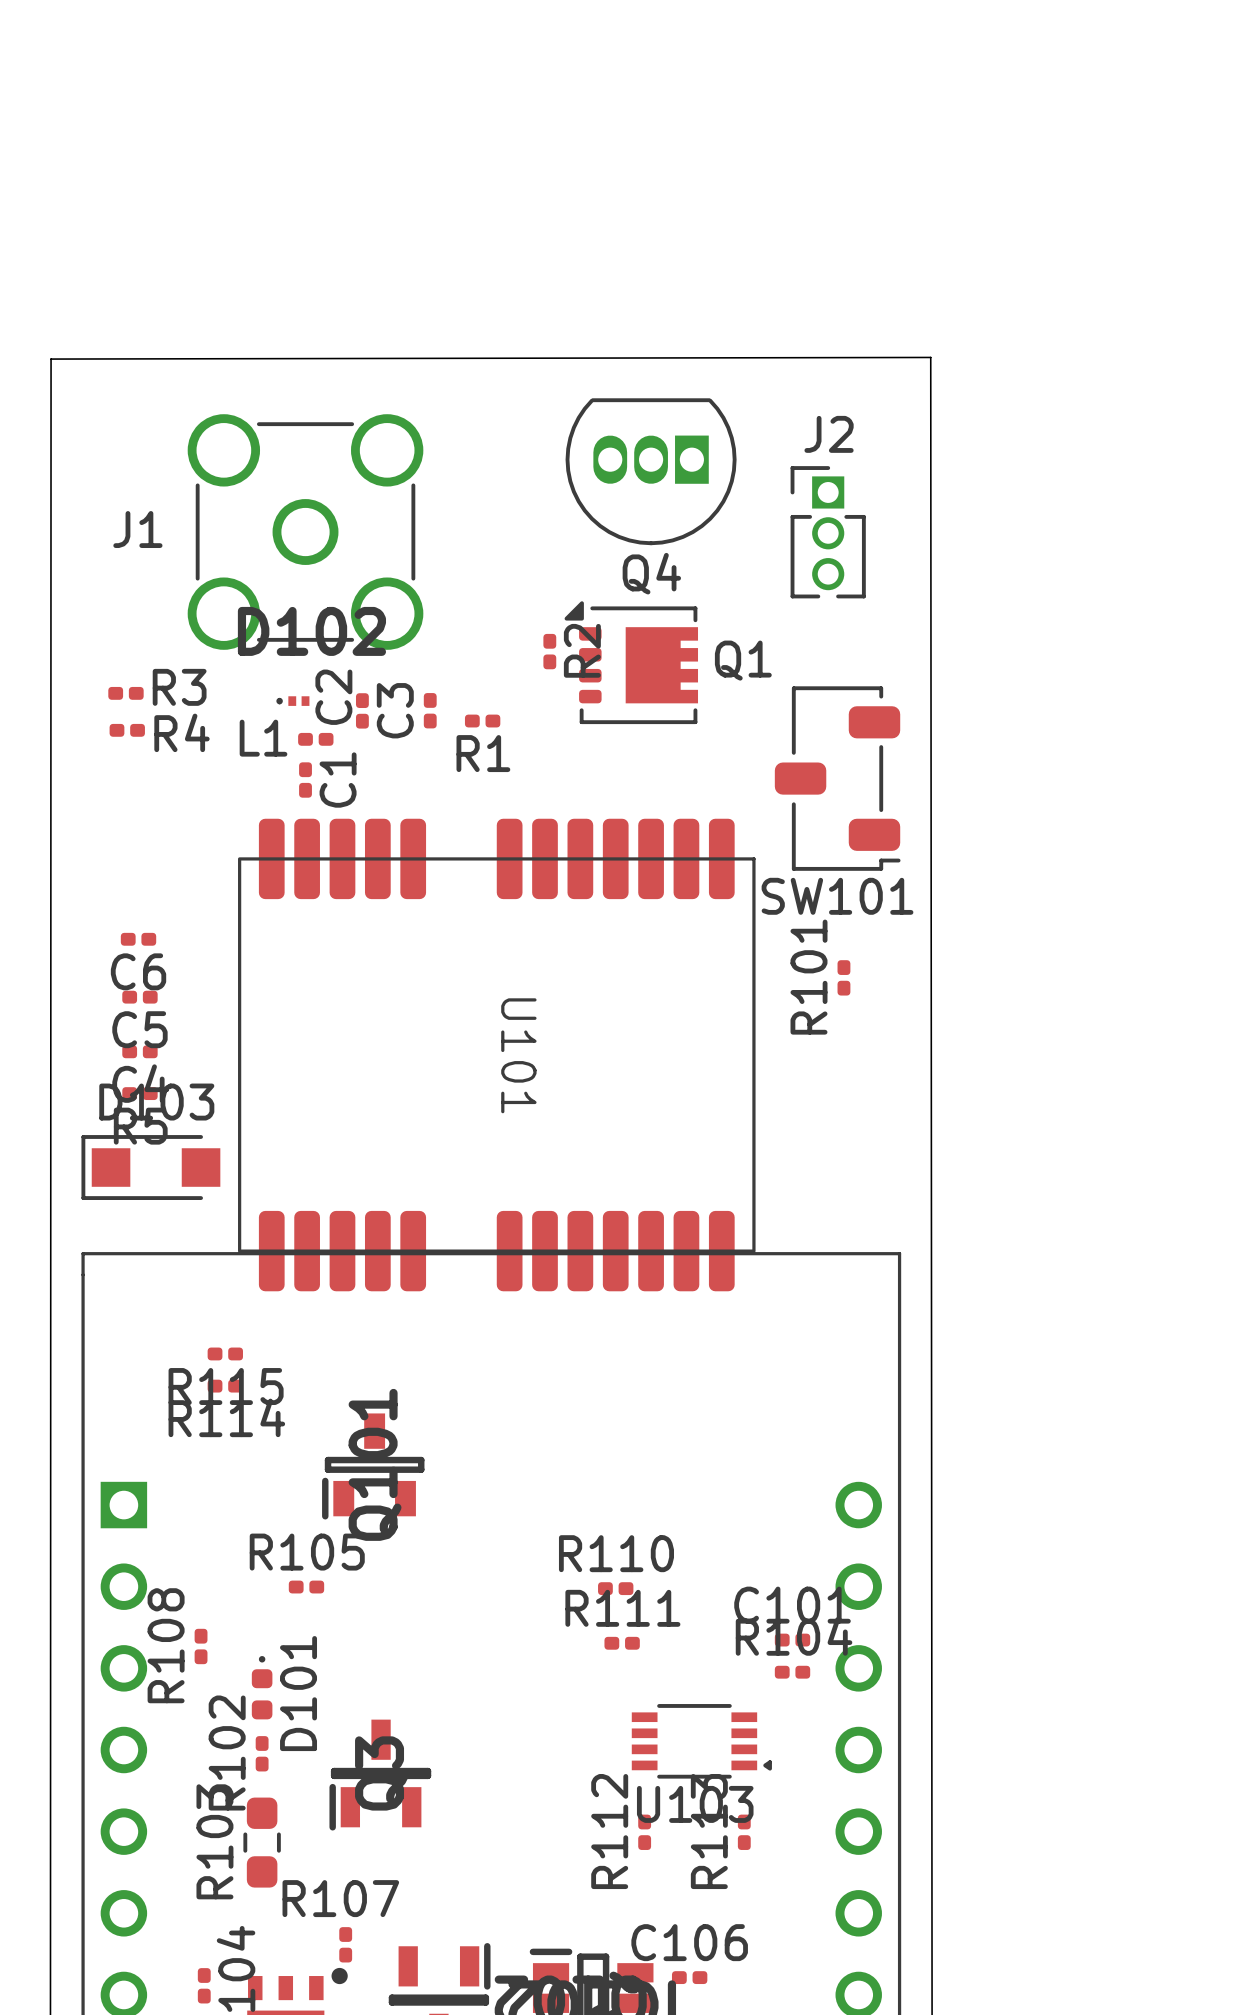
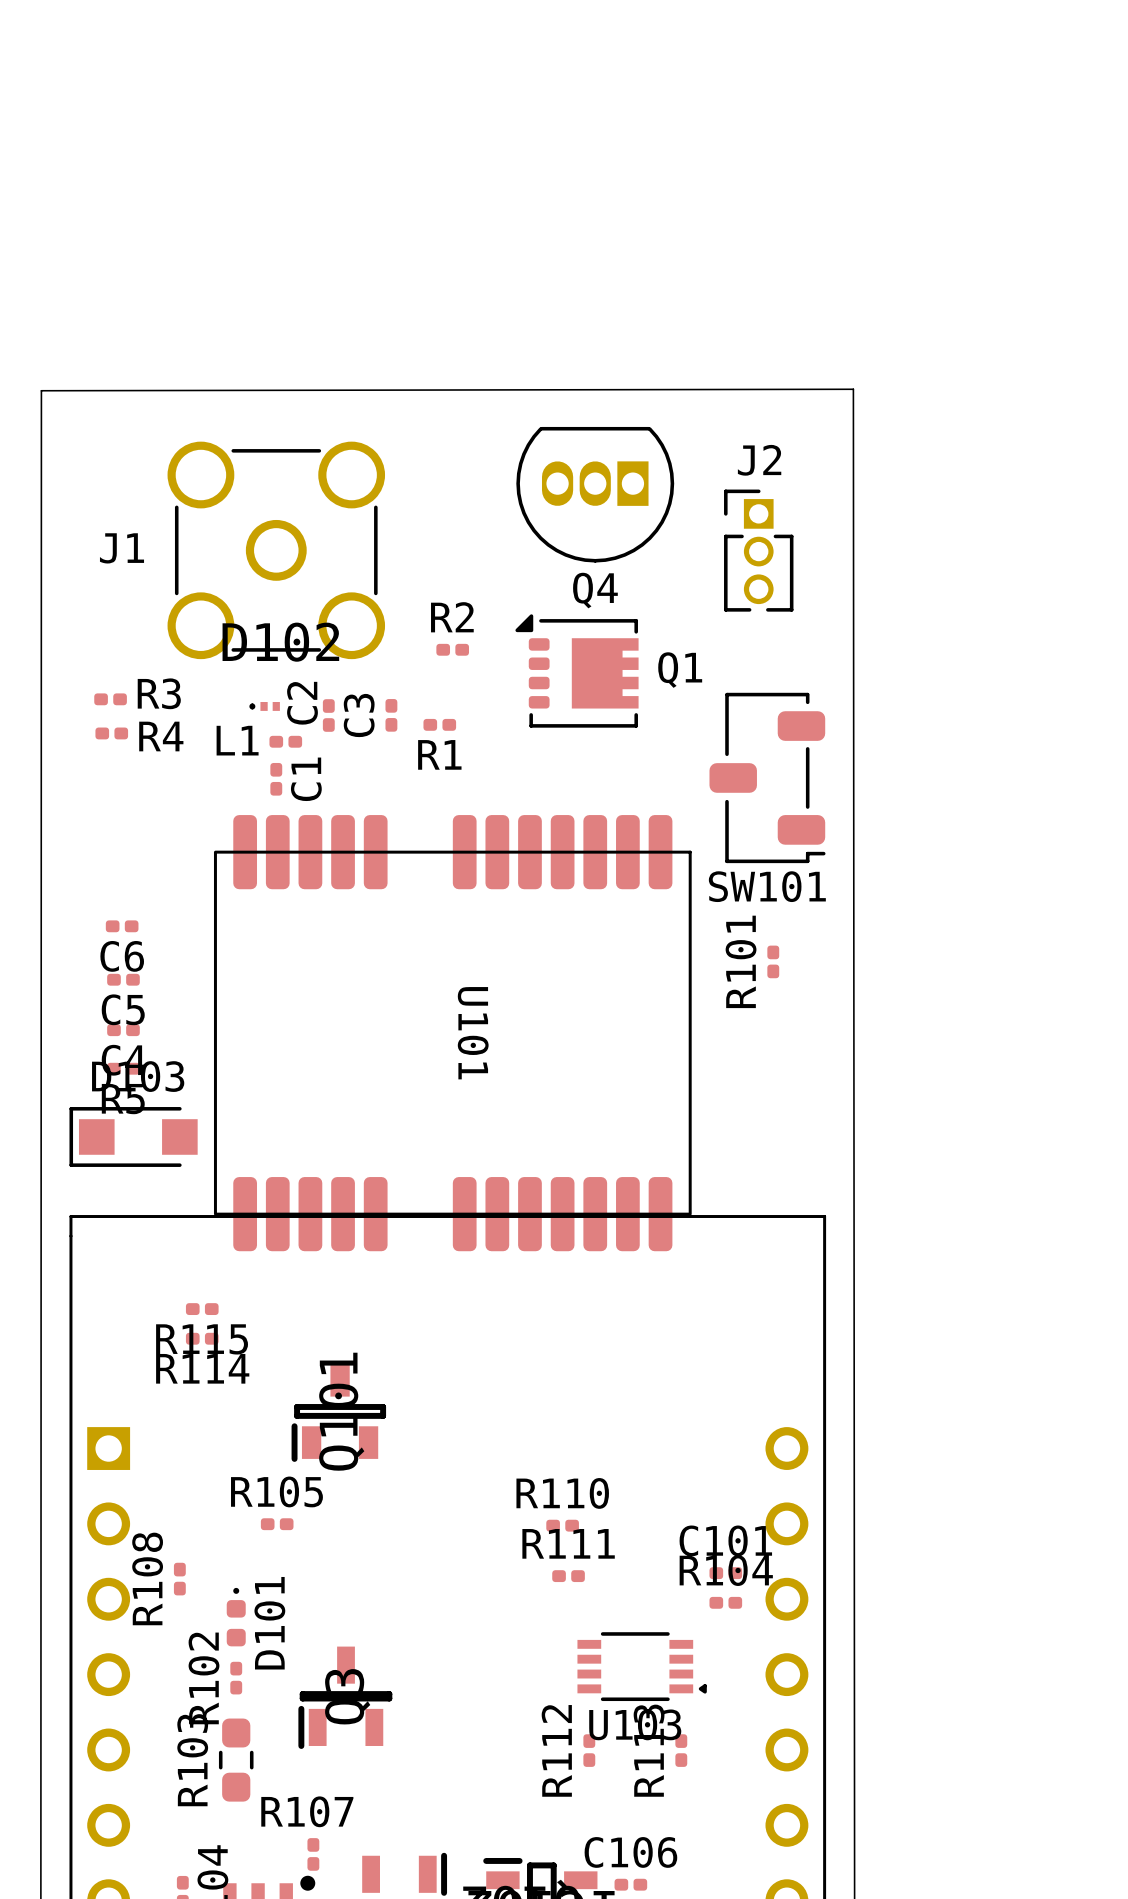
R2 rotation: 0° (549, 651) -> 90° clockwise (452, 649)
R2 position: (549, 651) -> (452, 649)

